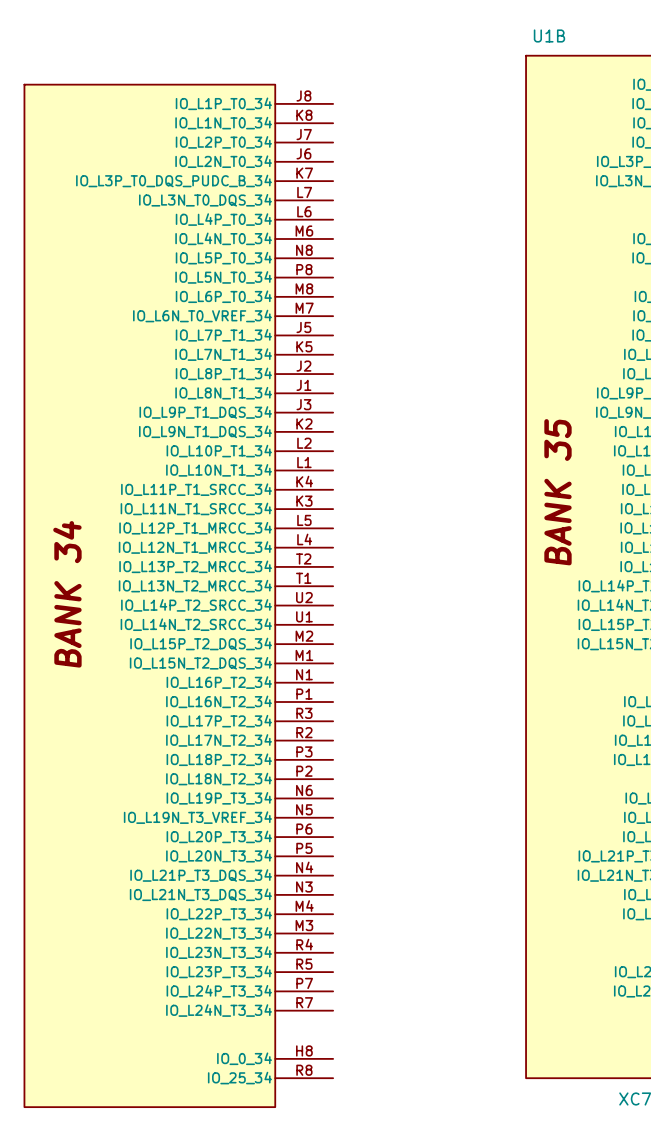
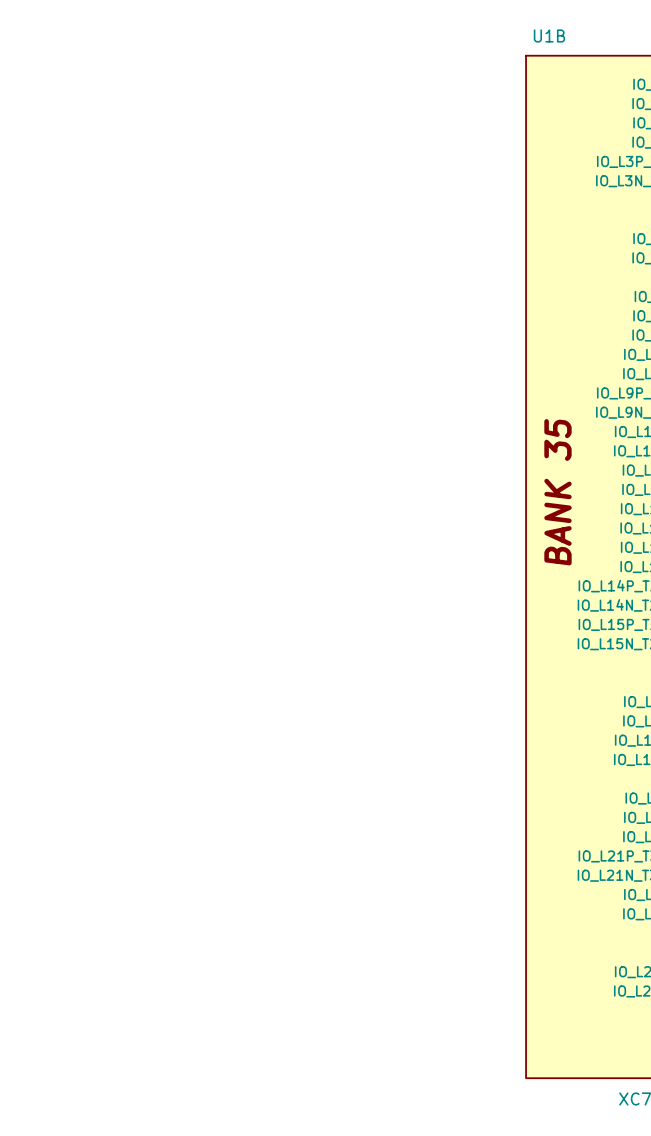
part: (178, 595) -> none

